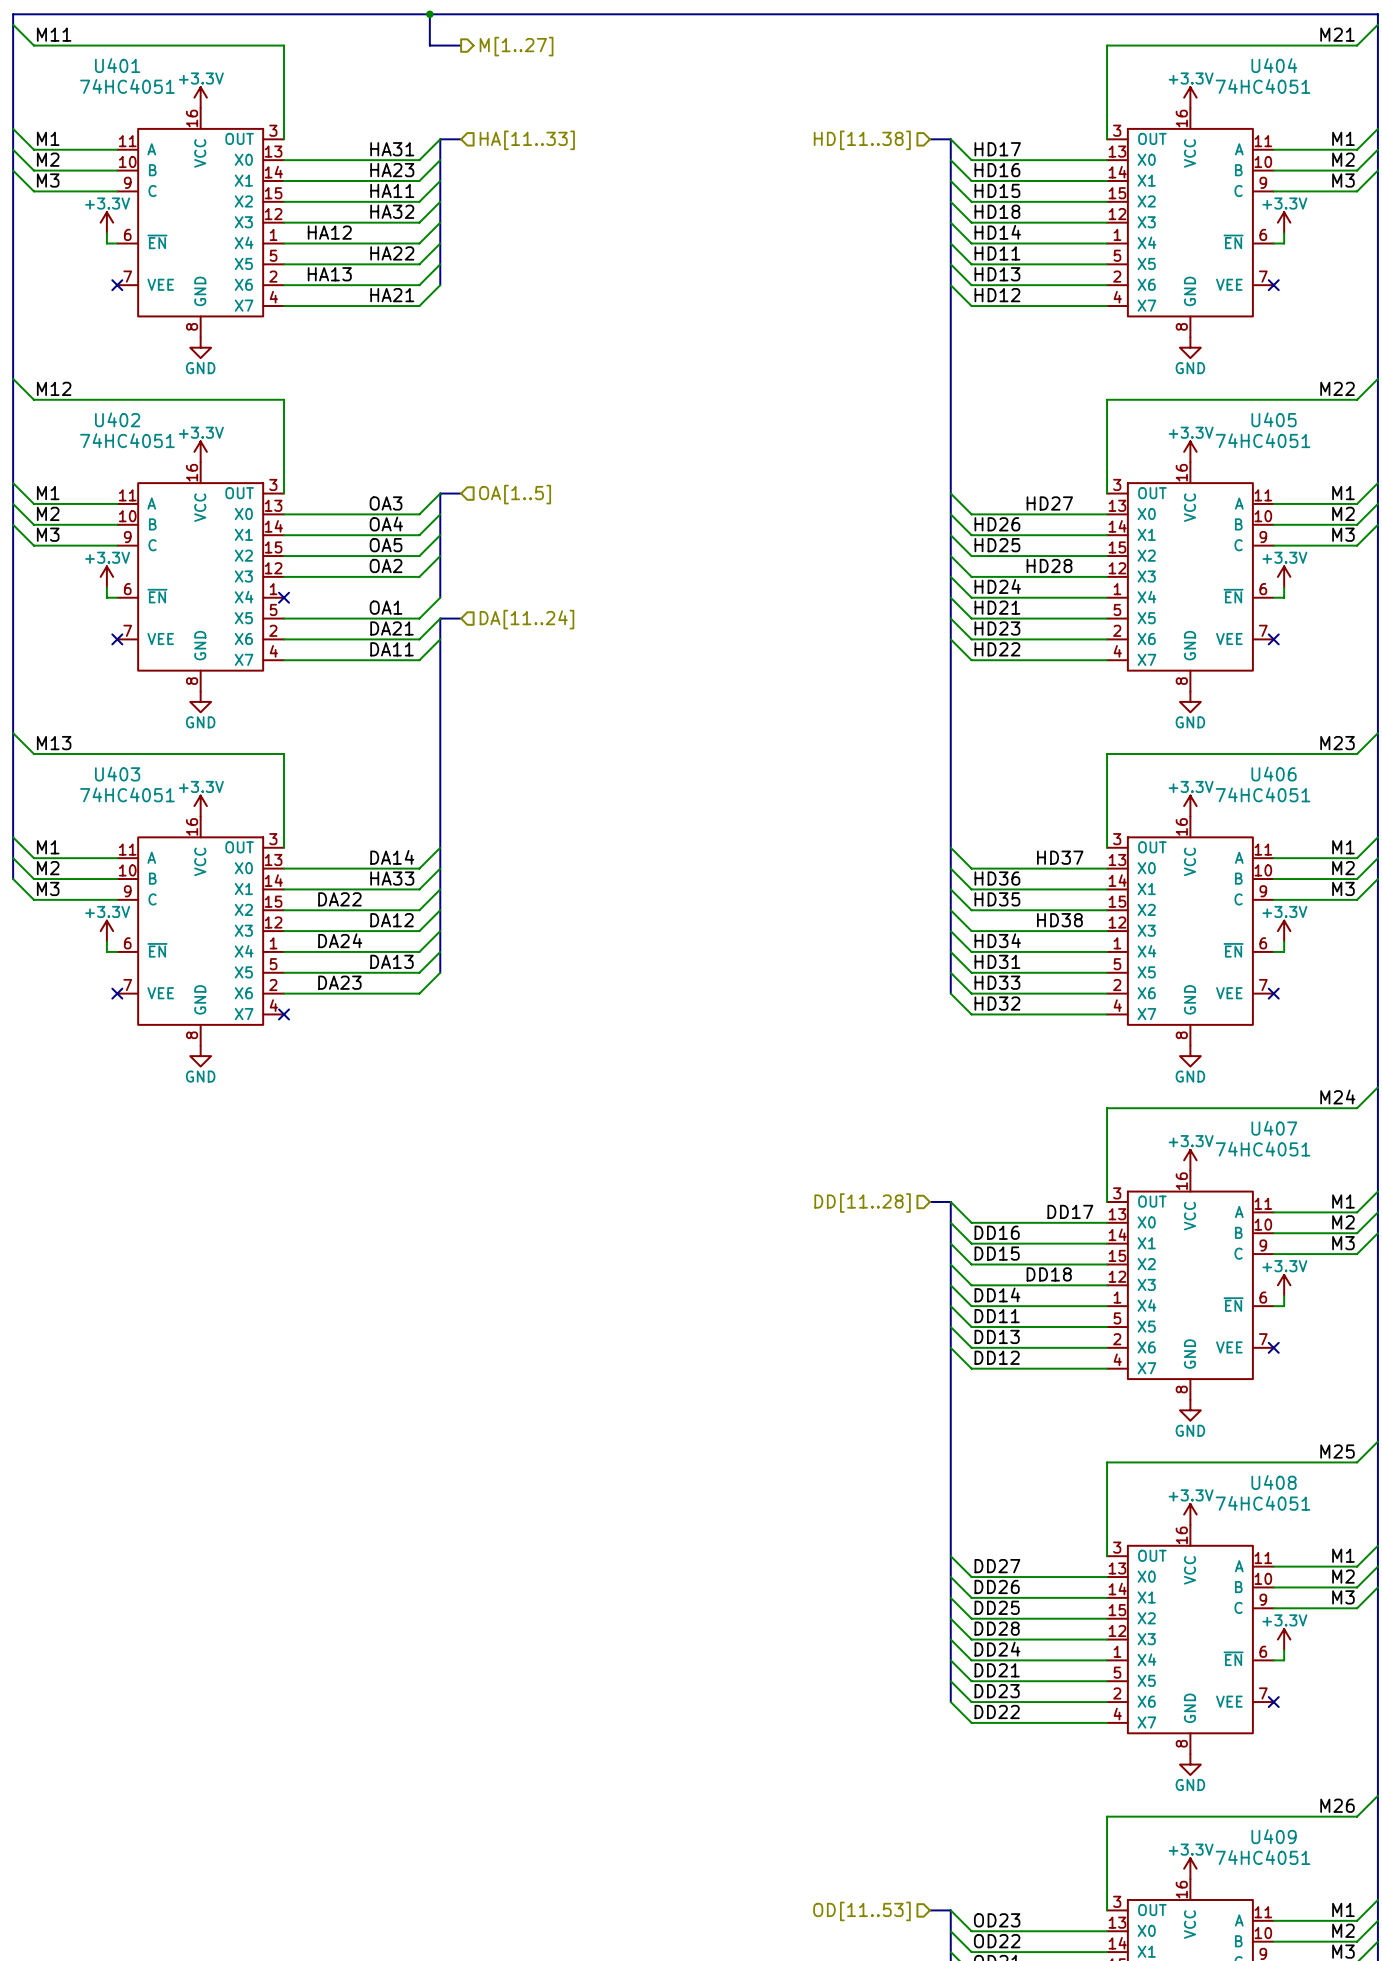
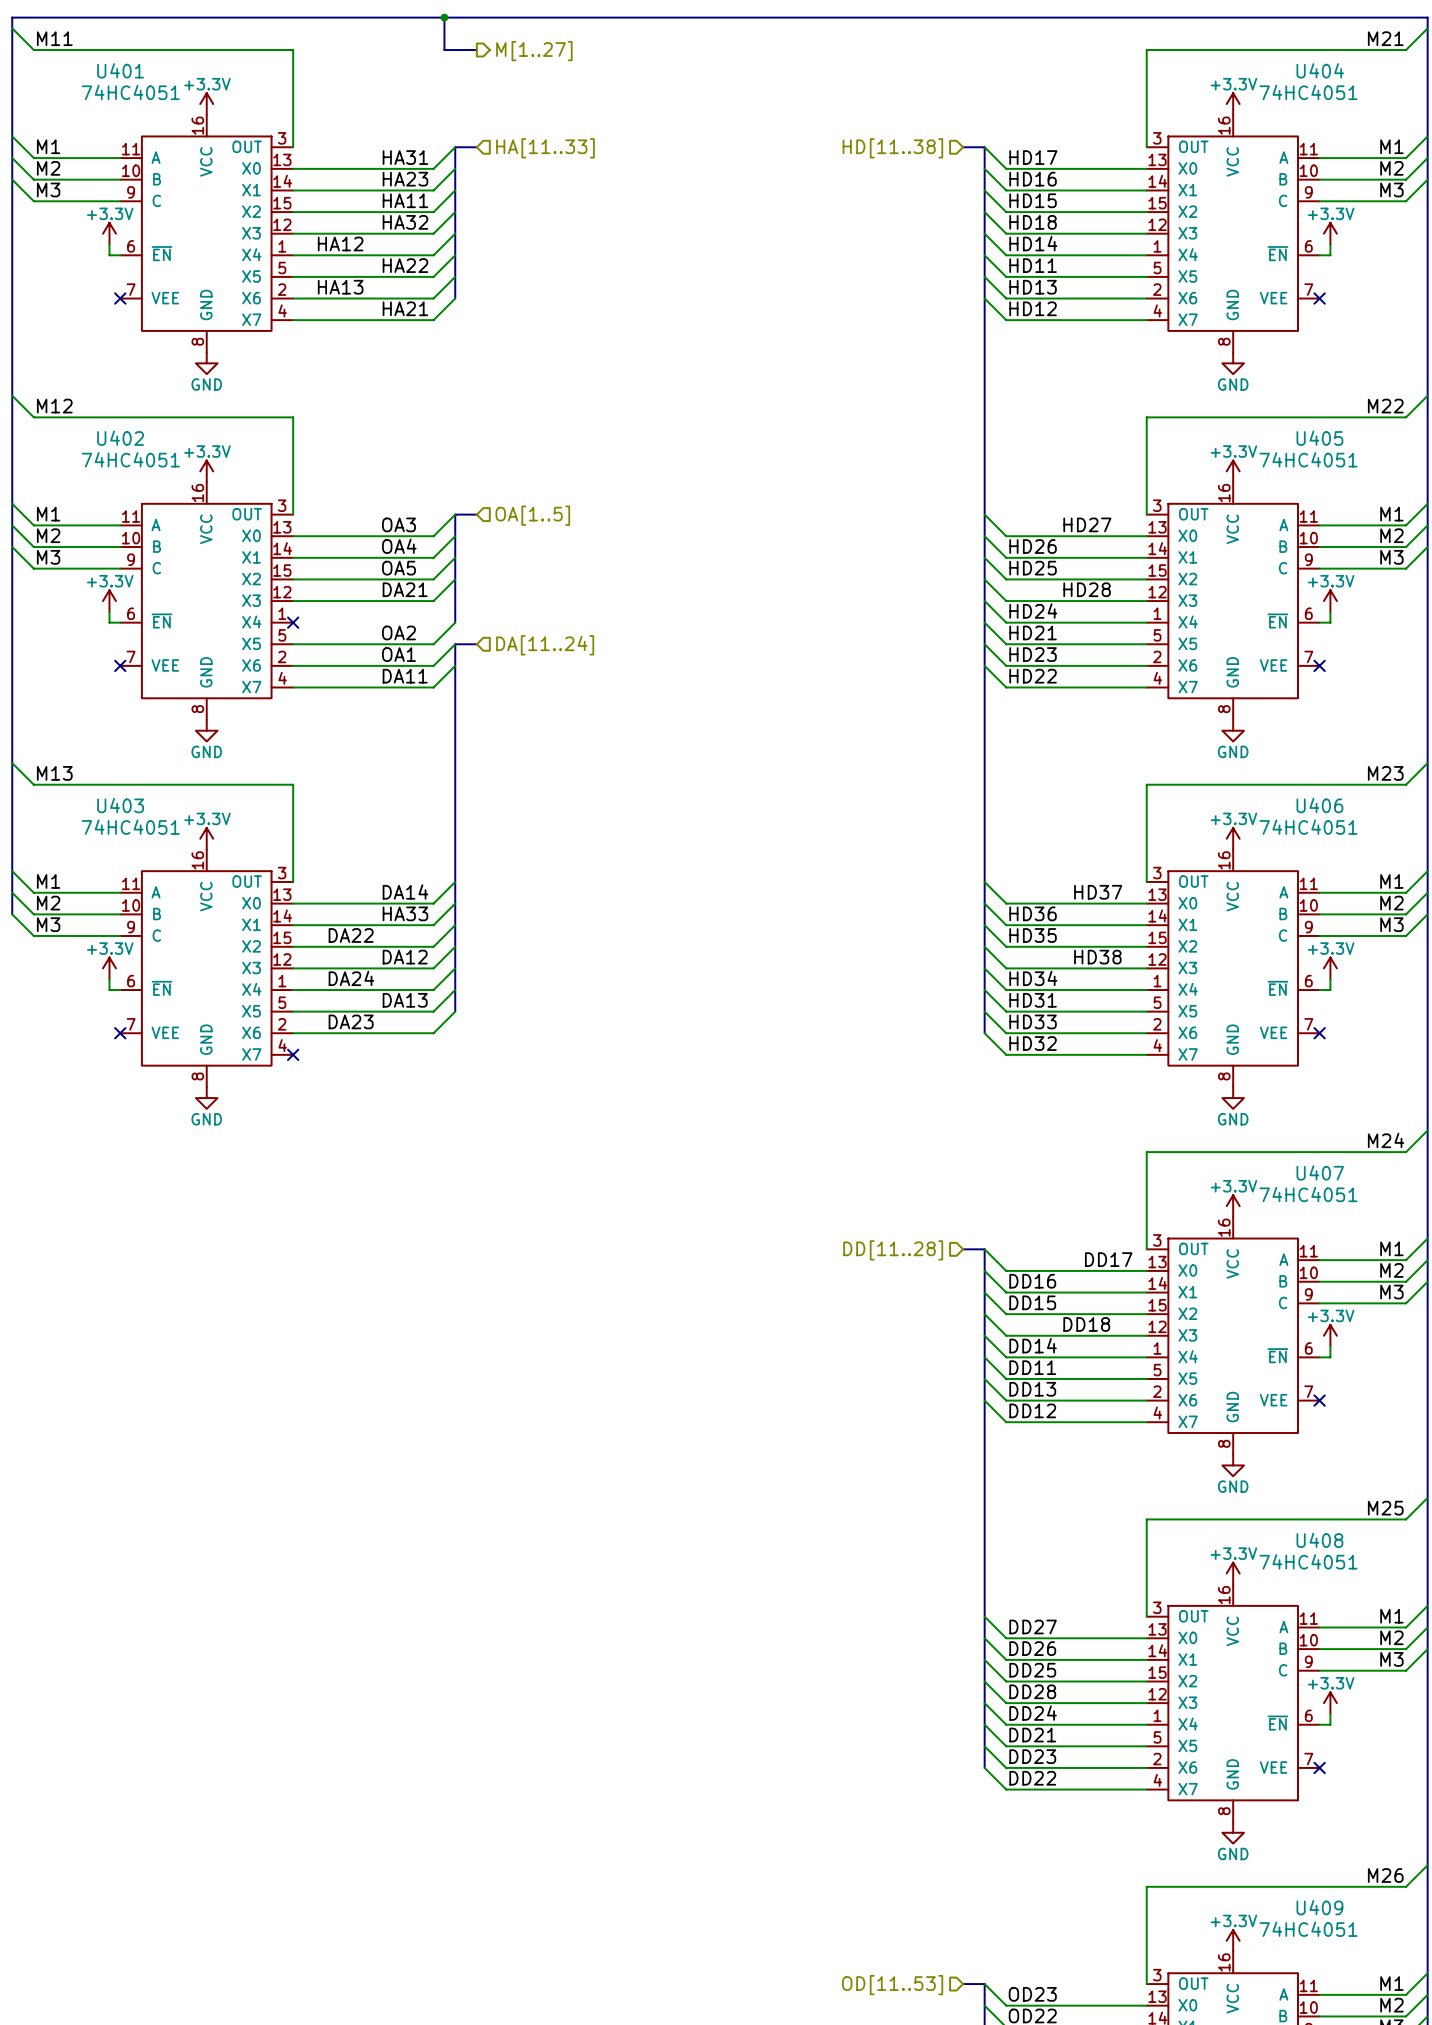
label: OA2 (386, 565) -> DA21 (405, 589)
label: OA1 (386, 607) -> OA2 (398, 632)
label: DA21 (391, 628) -> OA1 (398, 654)

